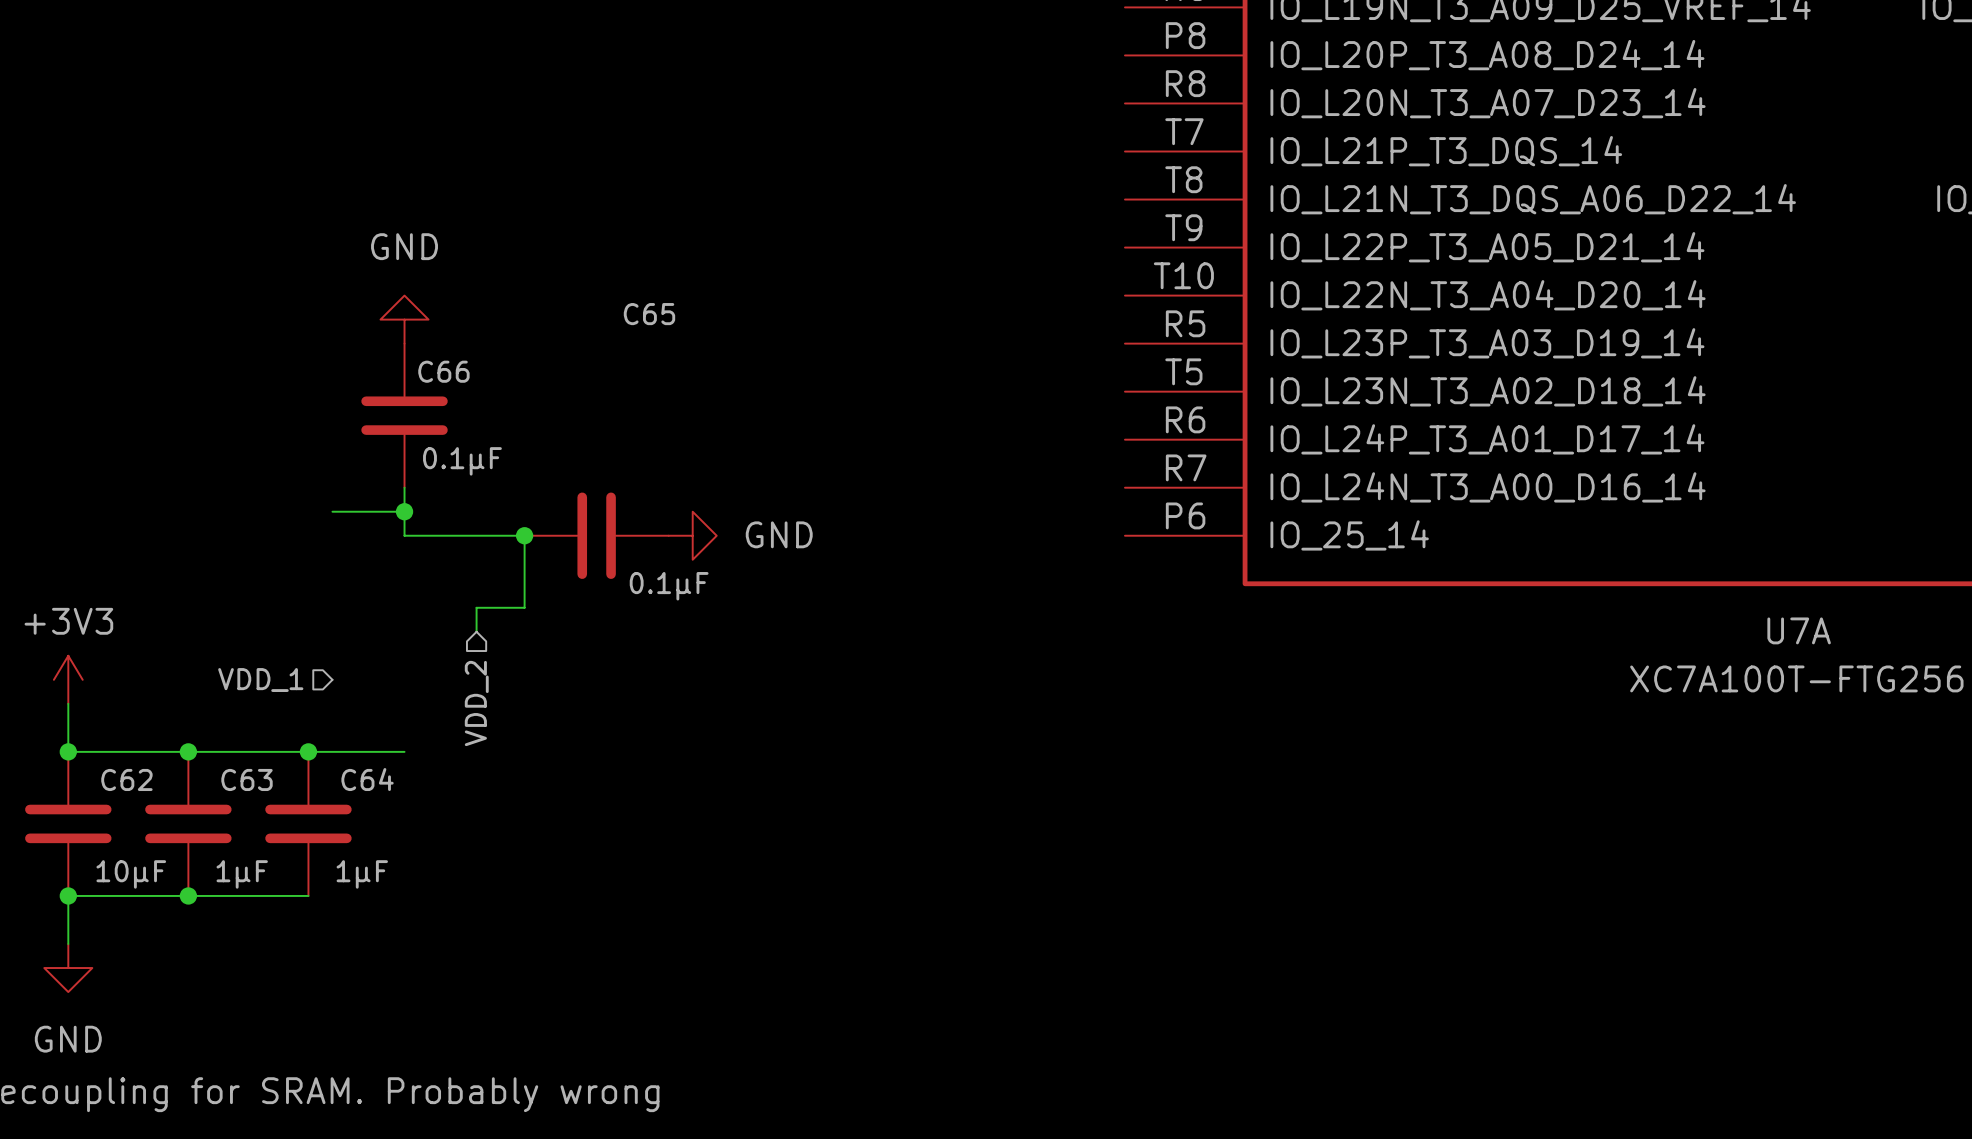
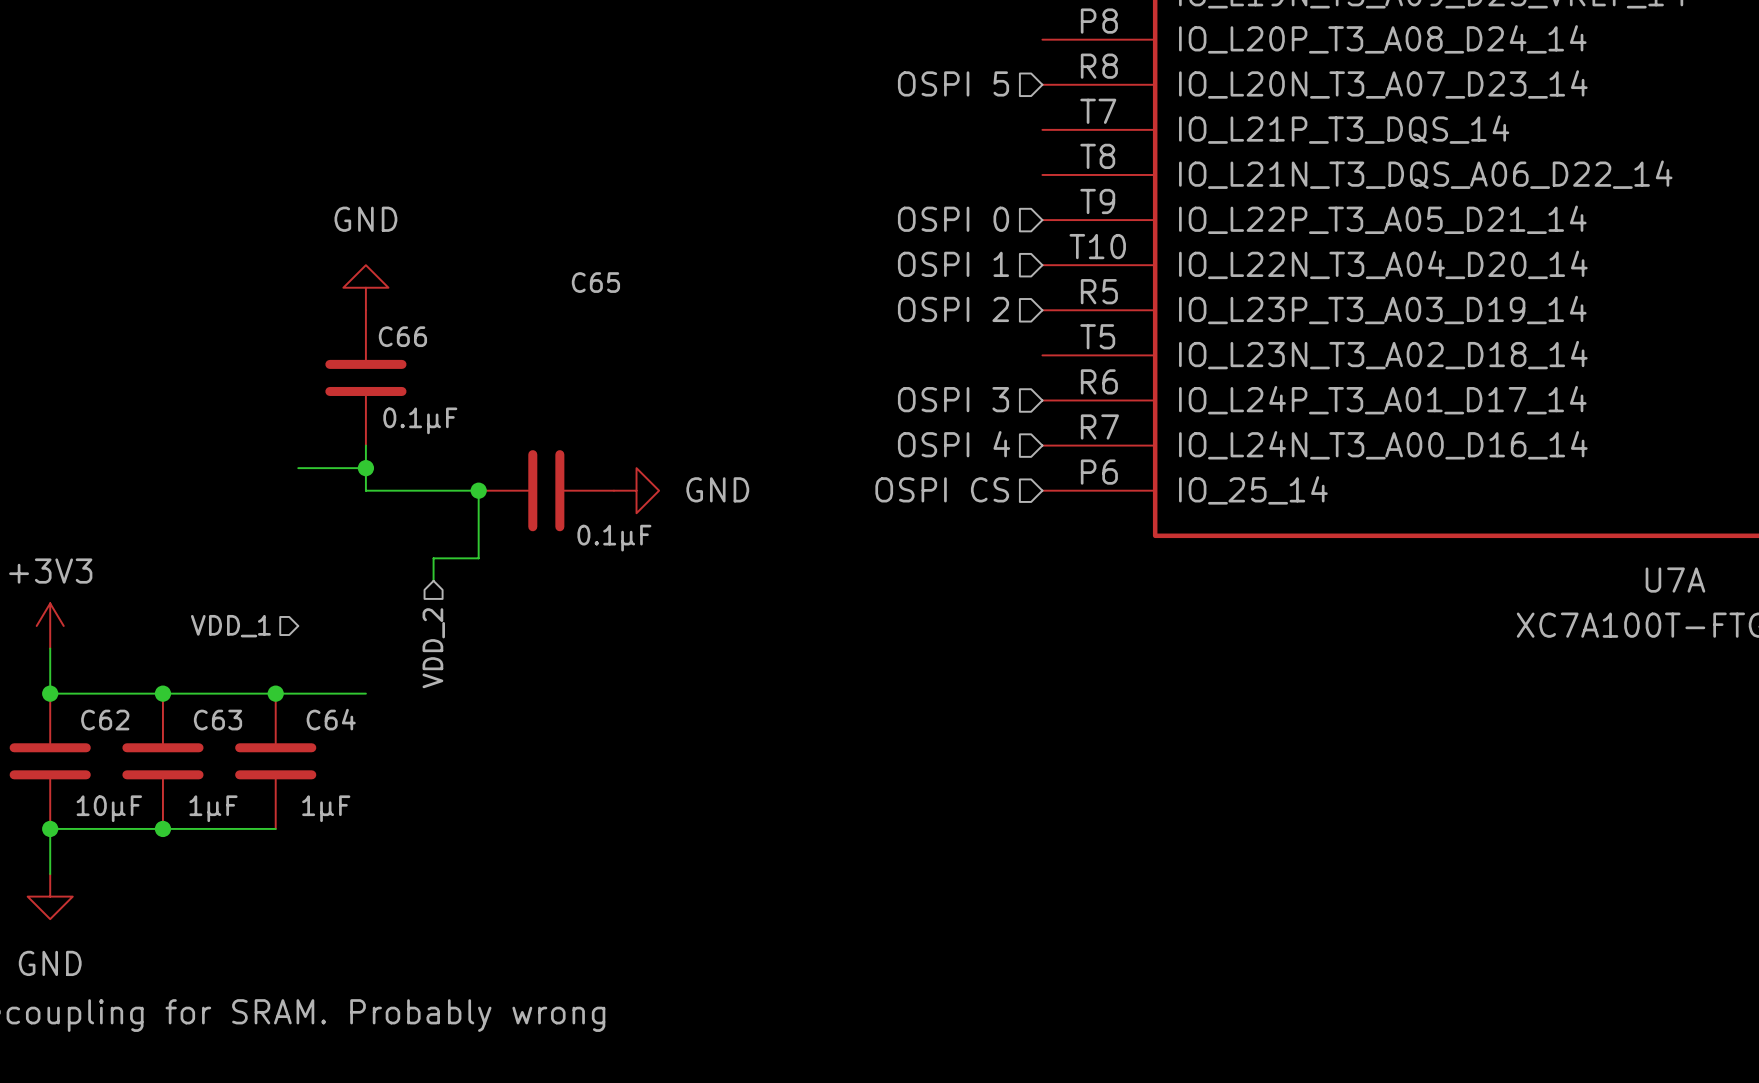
hierarchical label: none -> OSPI 5 (953, 83)
hierarchical label: none -> OSPI 0 (953, 219)
hierarchical label: none -> OSPI 1 (953, 264)
hierarchical label: none -> OSPI 2 (953, 309)
hierarchical label: none -> OSPI 3 (953, 399)
hierarchical label: none -> OSPI 4 (954, 444)
hierarchical label: none -> OSPI CS (942, 489)

